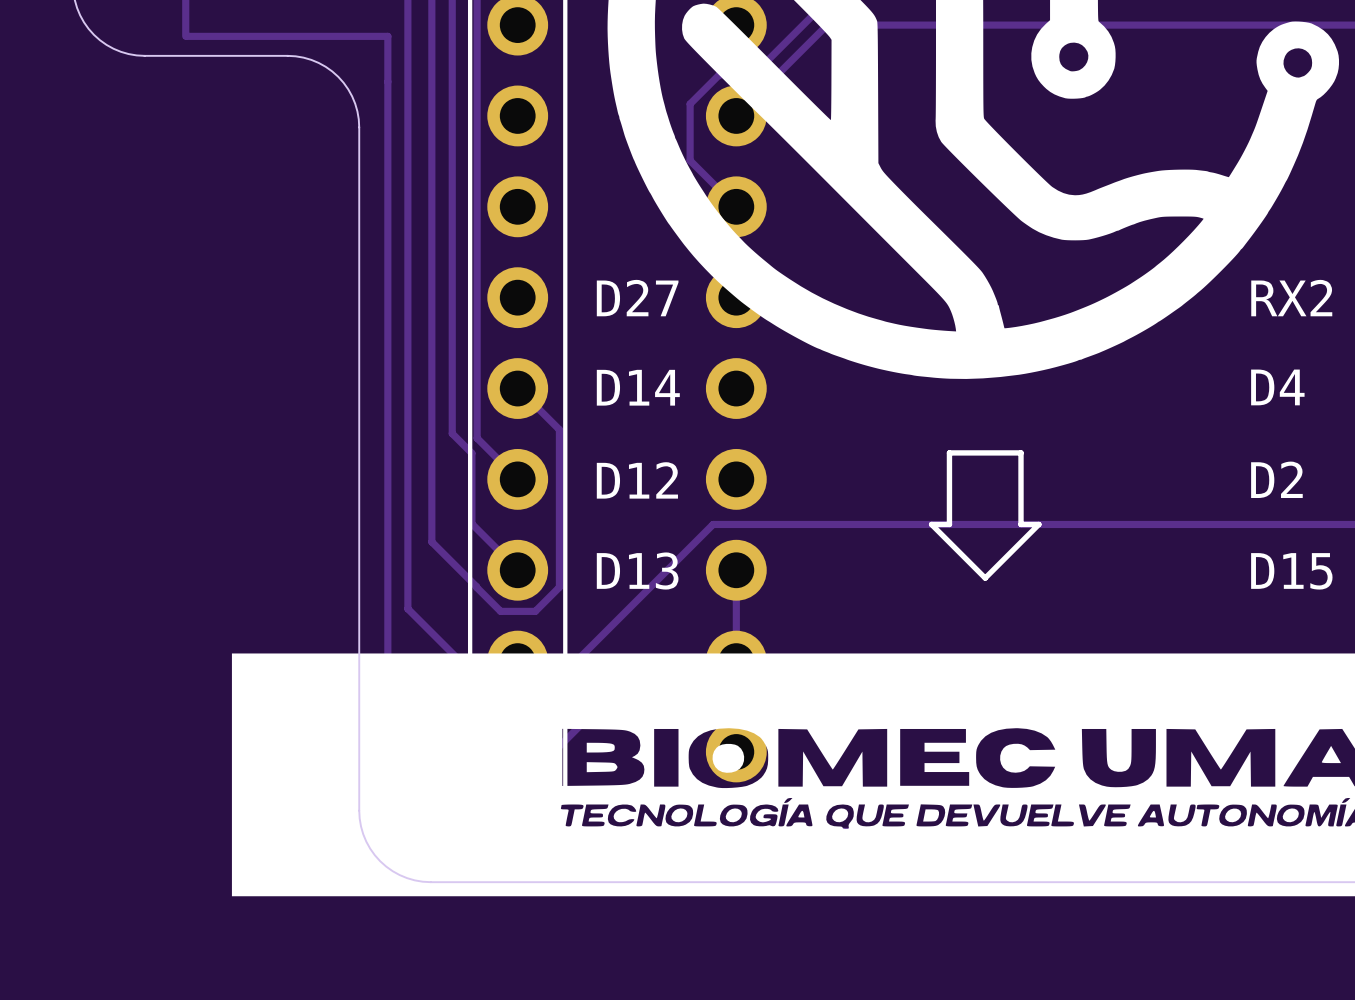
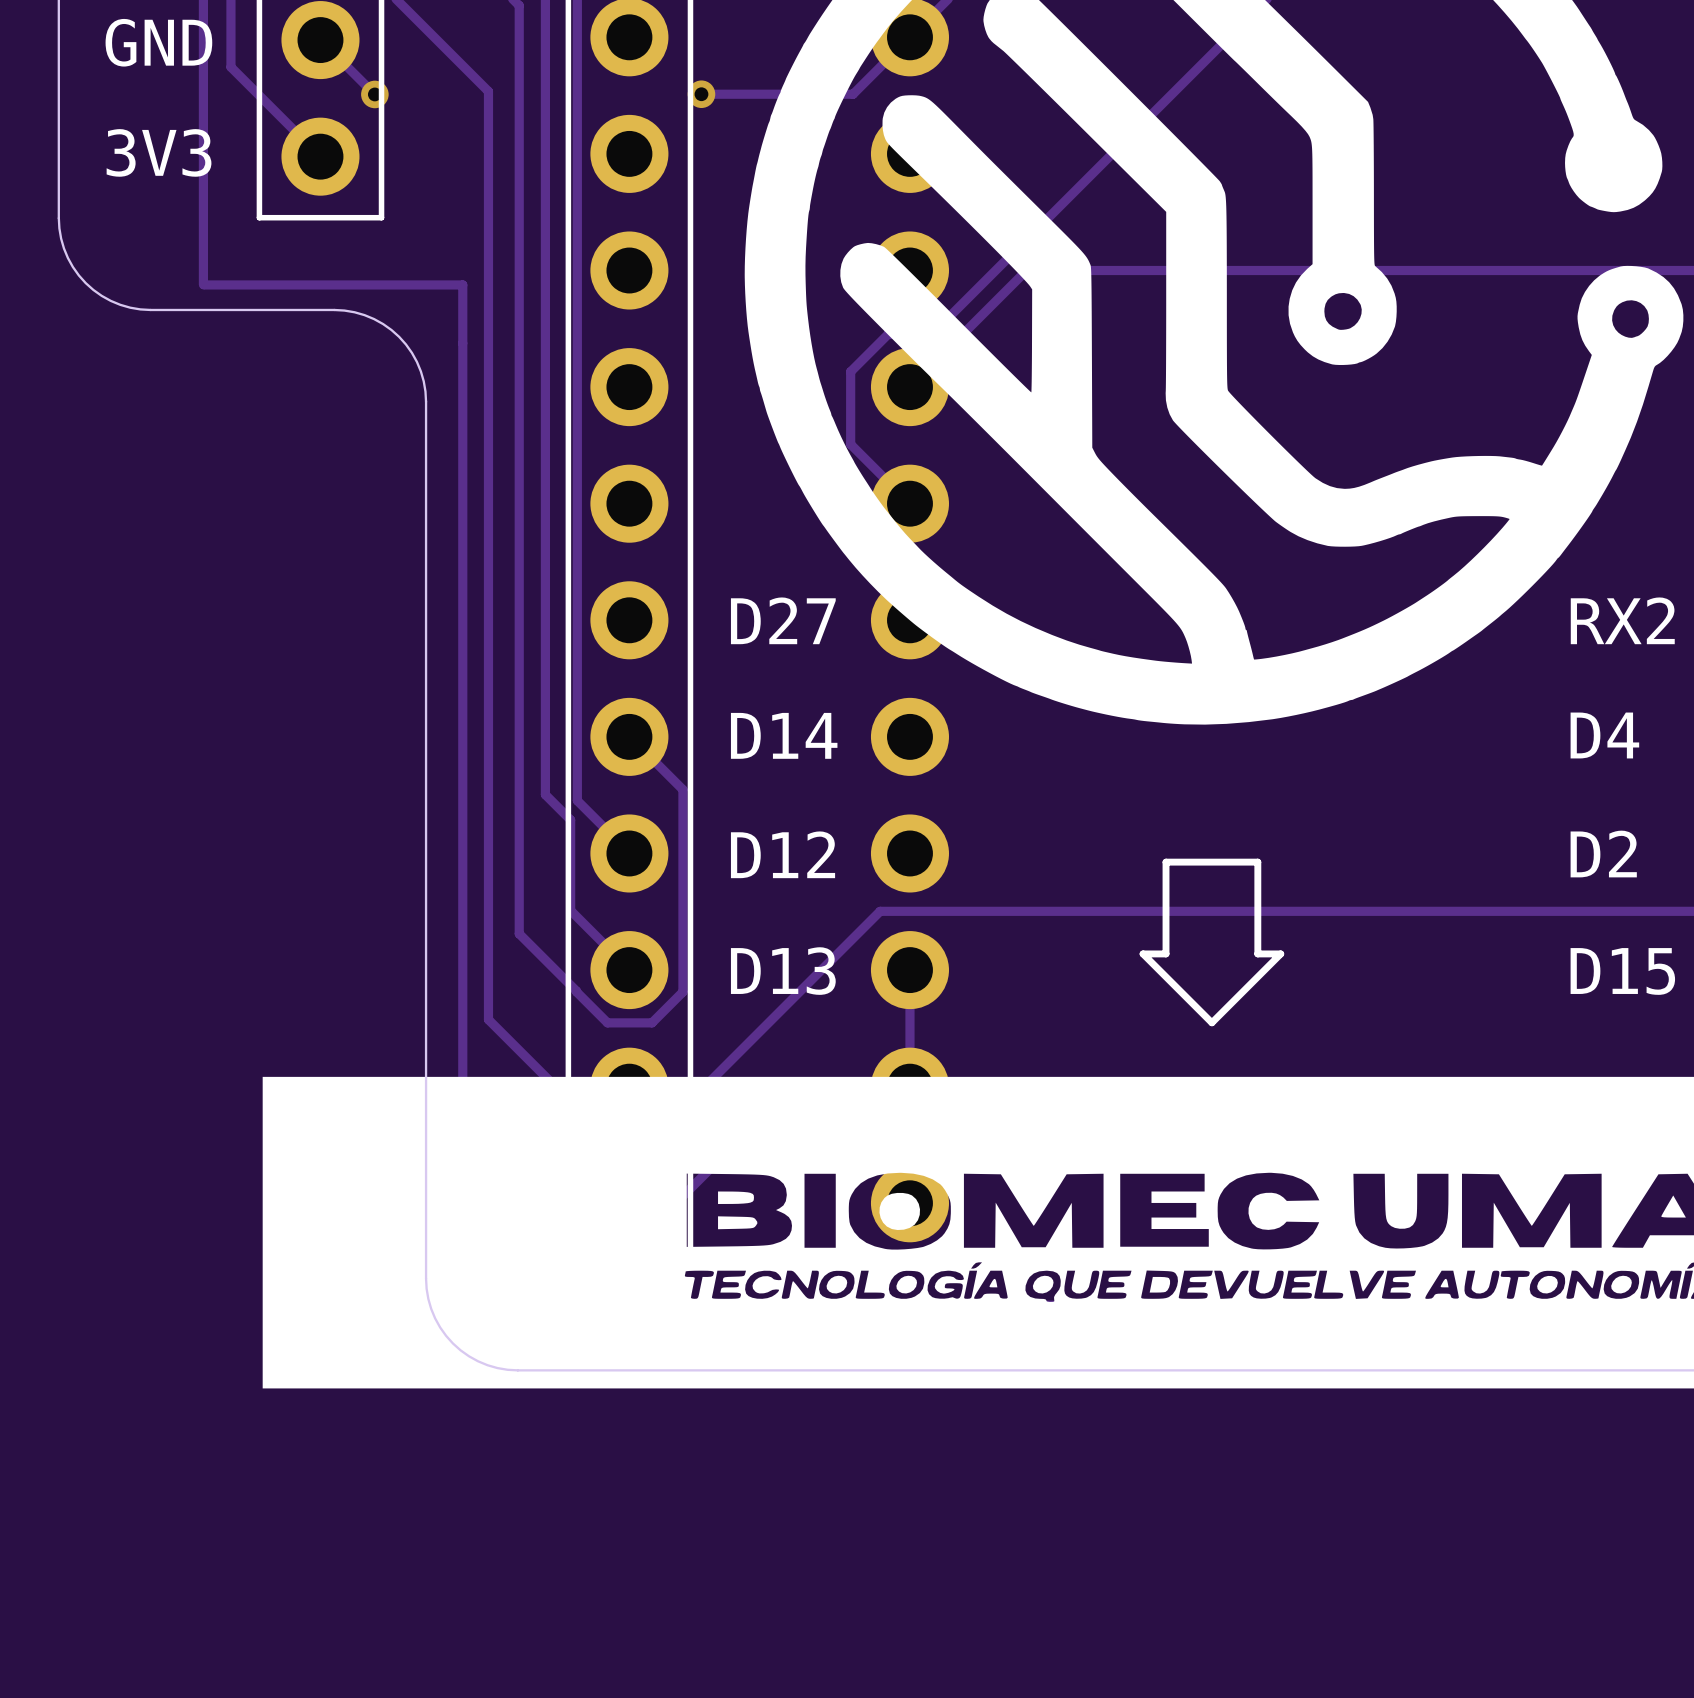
line: (949, 452) (949, 524) (931, 524) (985, 578) (1038, 524) (1021, 524) (1021, 452) (949, 452) -> (1166, 862) (1166, 953) (1143, 953) (1211, 1022) (1280, 953) (1257, 953) (1257, 862) (1166, 862)

